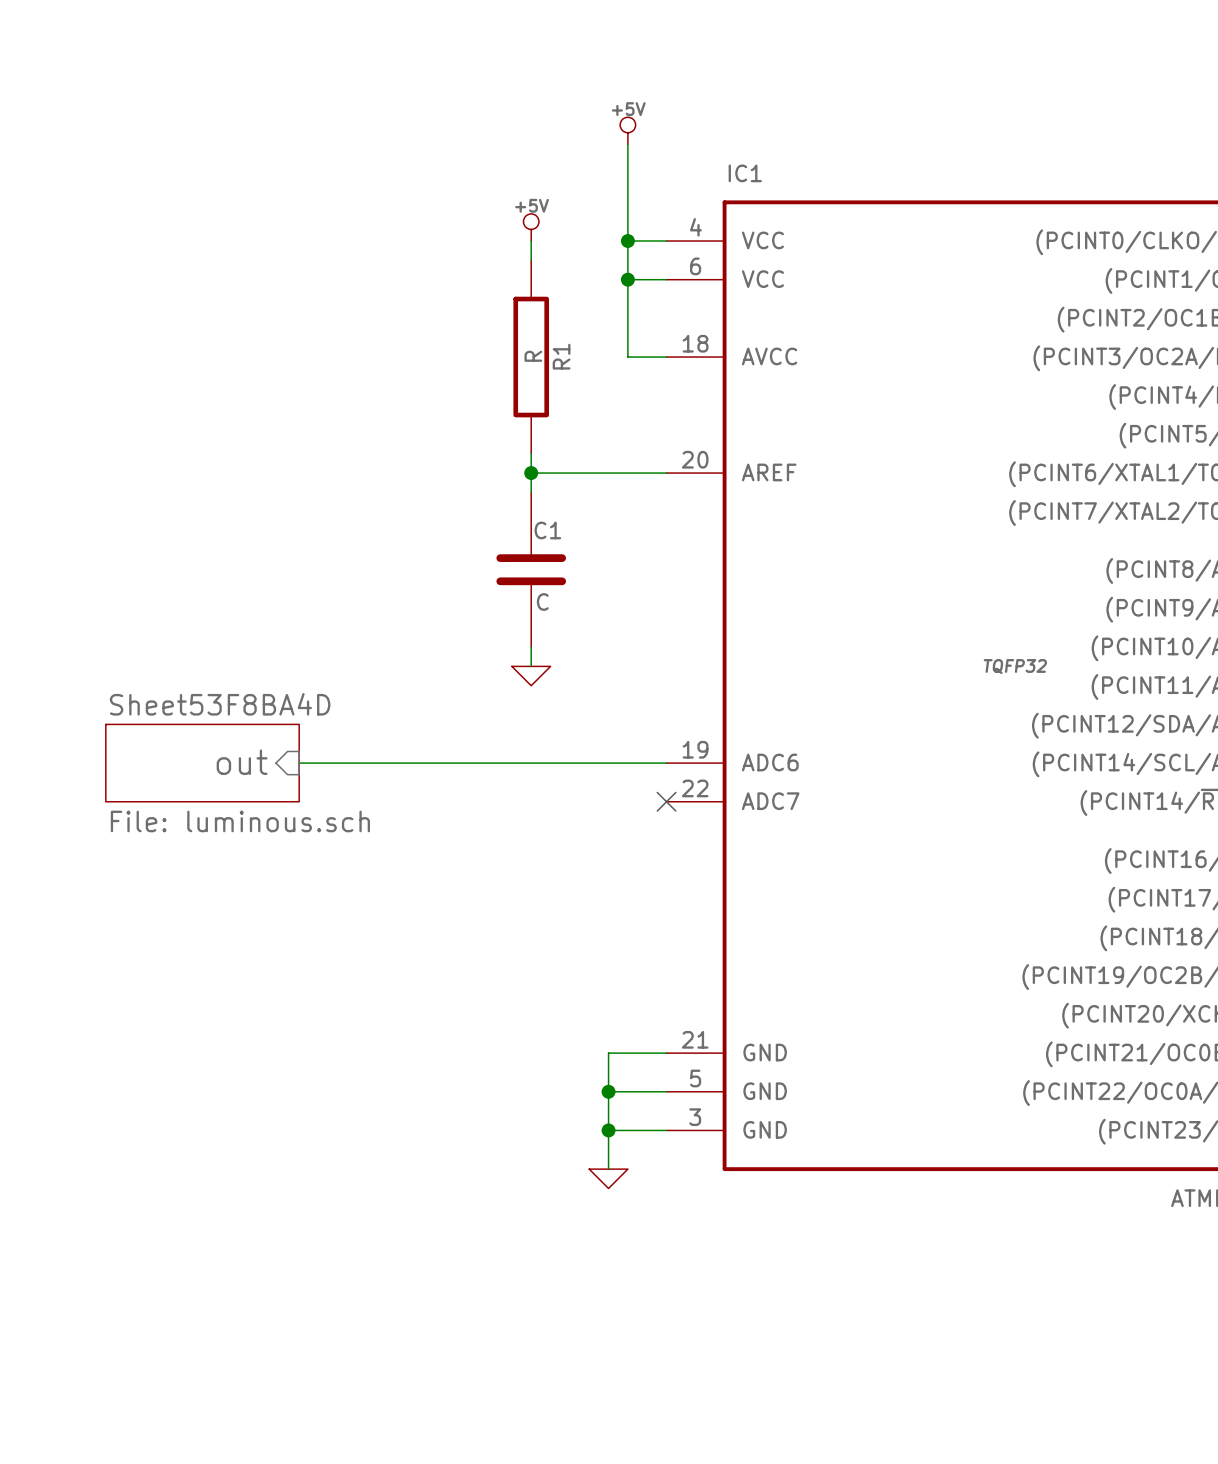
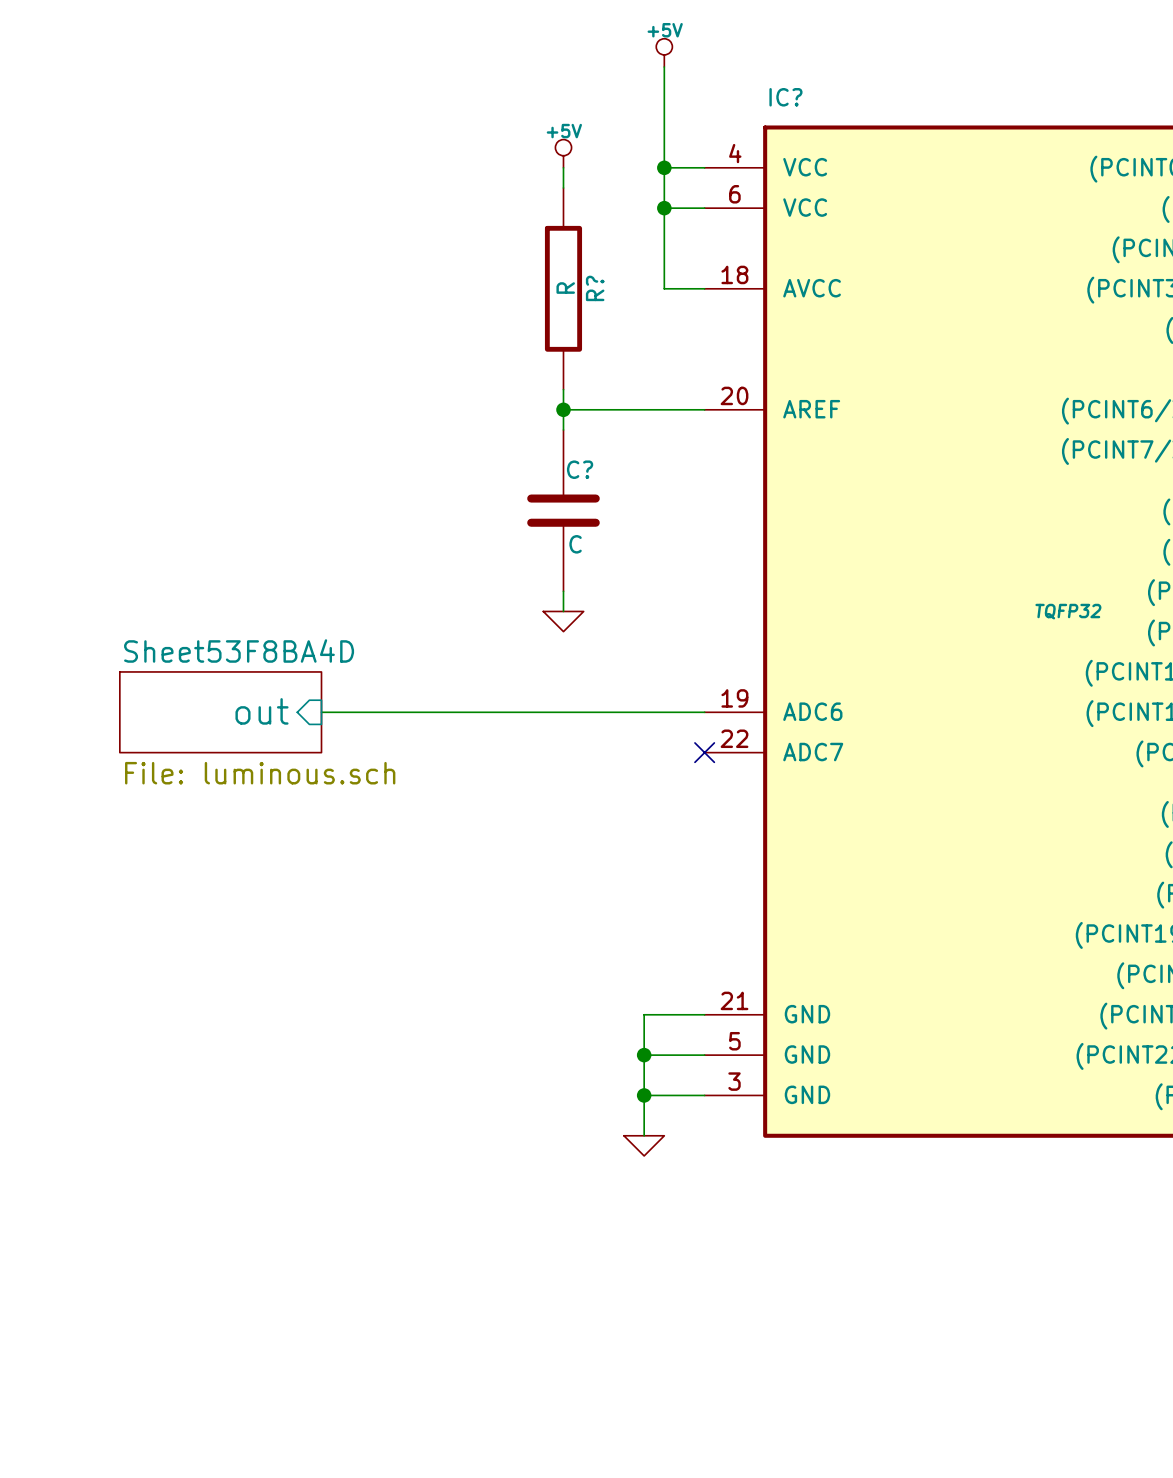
IC1 name: IC1 (745, 173) -> IC? (785, 97)
R1 name: R1 (561, 356) -> R? (595, 288)
C1 name: C1 (547, 530) -> C? (580, 469)

